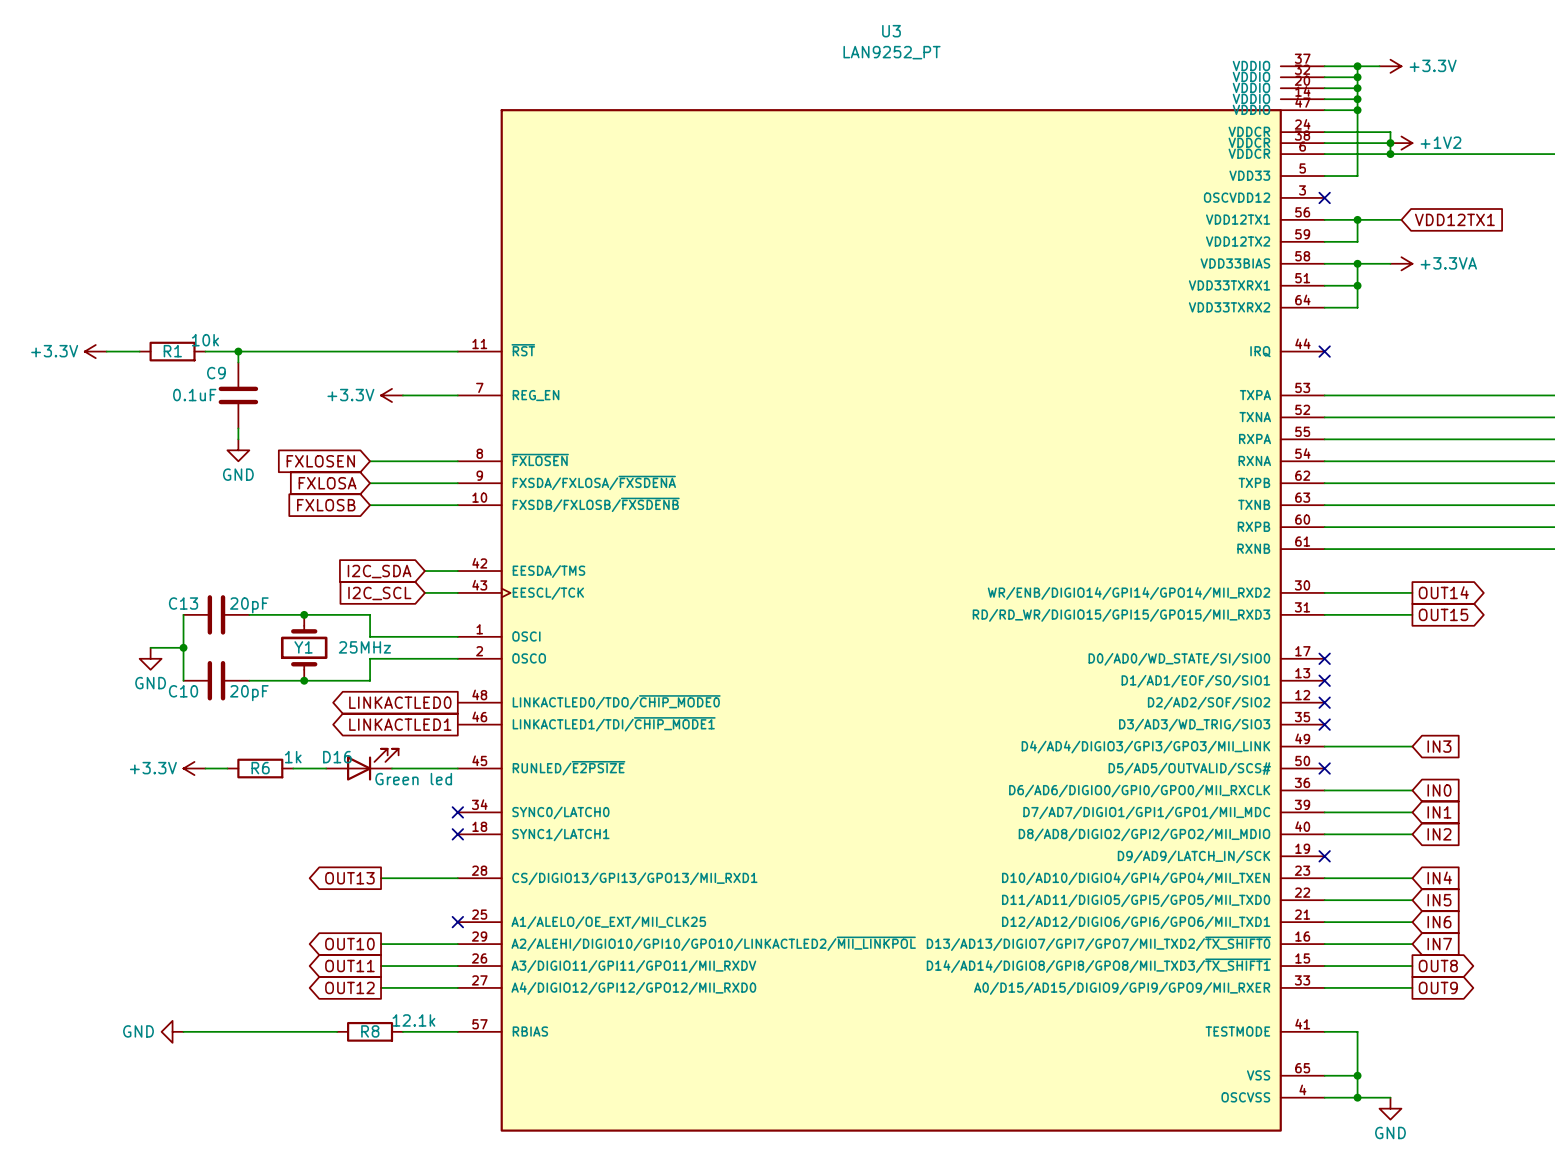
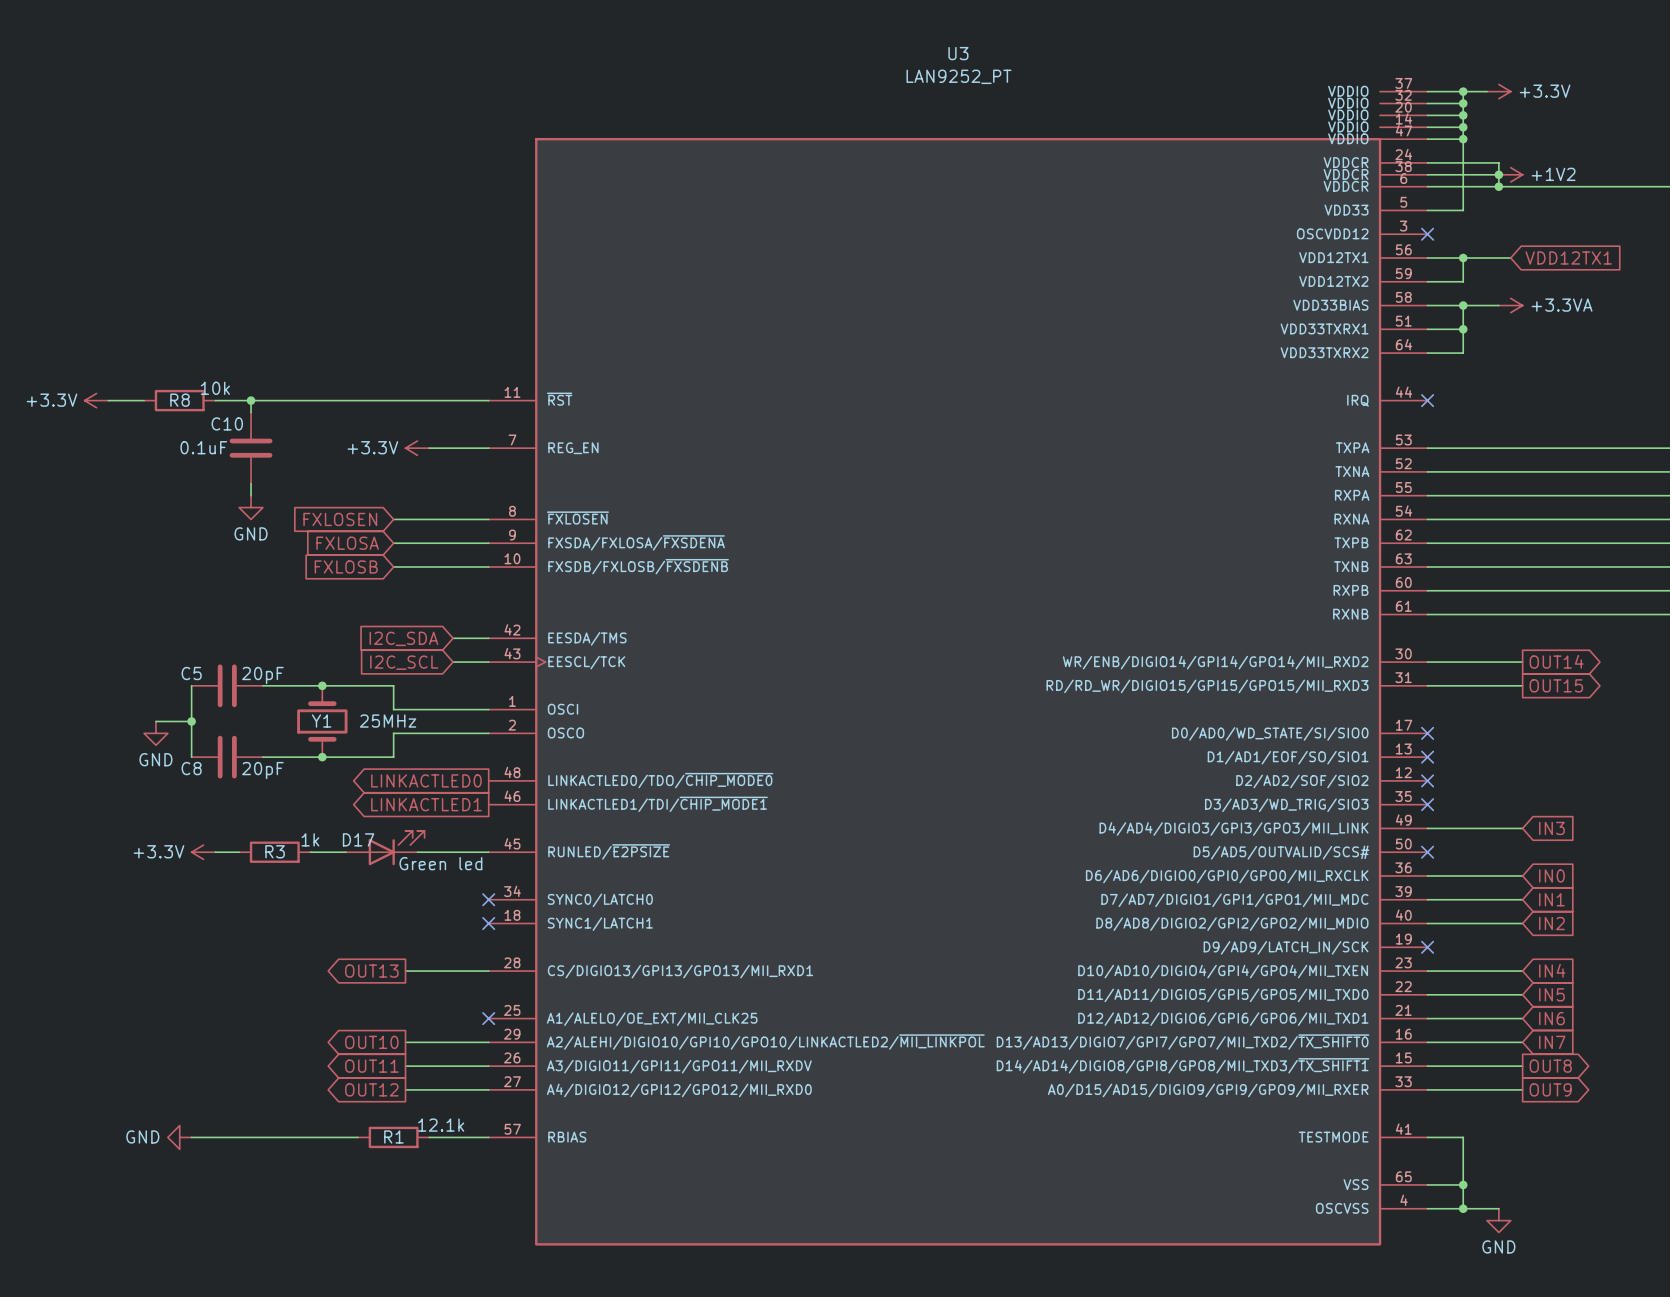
R1 name: R1 (172, 351) -> R8 (180, 400)
C9 name: C9 (216, 373) -> C10 (227, 423)
C13 name: C13 (183, 603) -> C5 (191, 673)
C10 name: C10 (183, 691) -> C8 (191, 768)
D16 name: D16 (337, 757) -> D17 (358, 839)
R6 name: R6 (260, 768) -> R3 (275, 851)
R8 name: R8 (370, 1031) -> R1 (393, 1136)

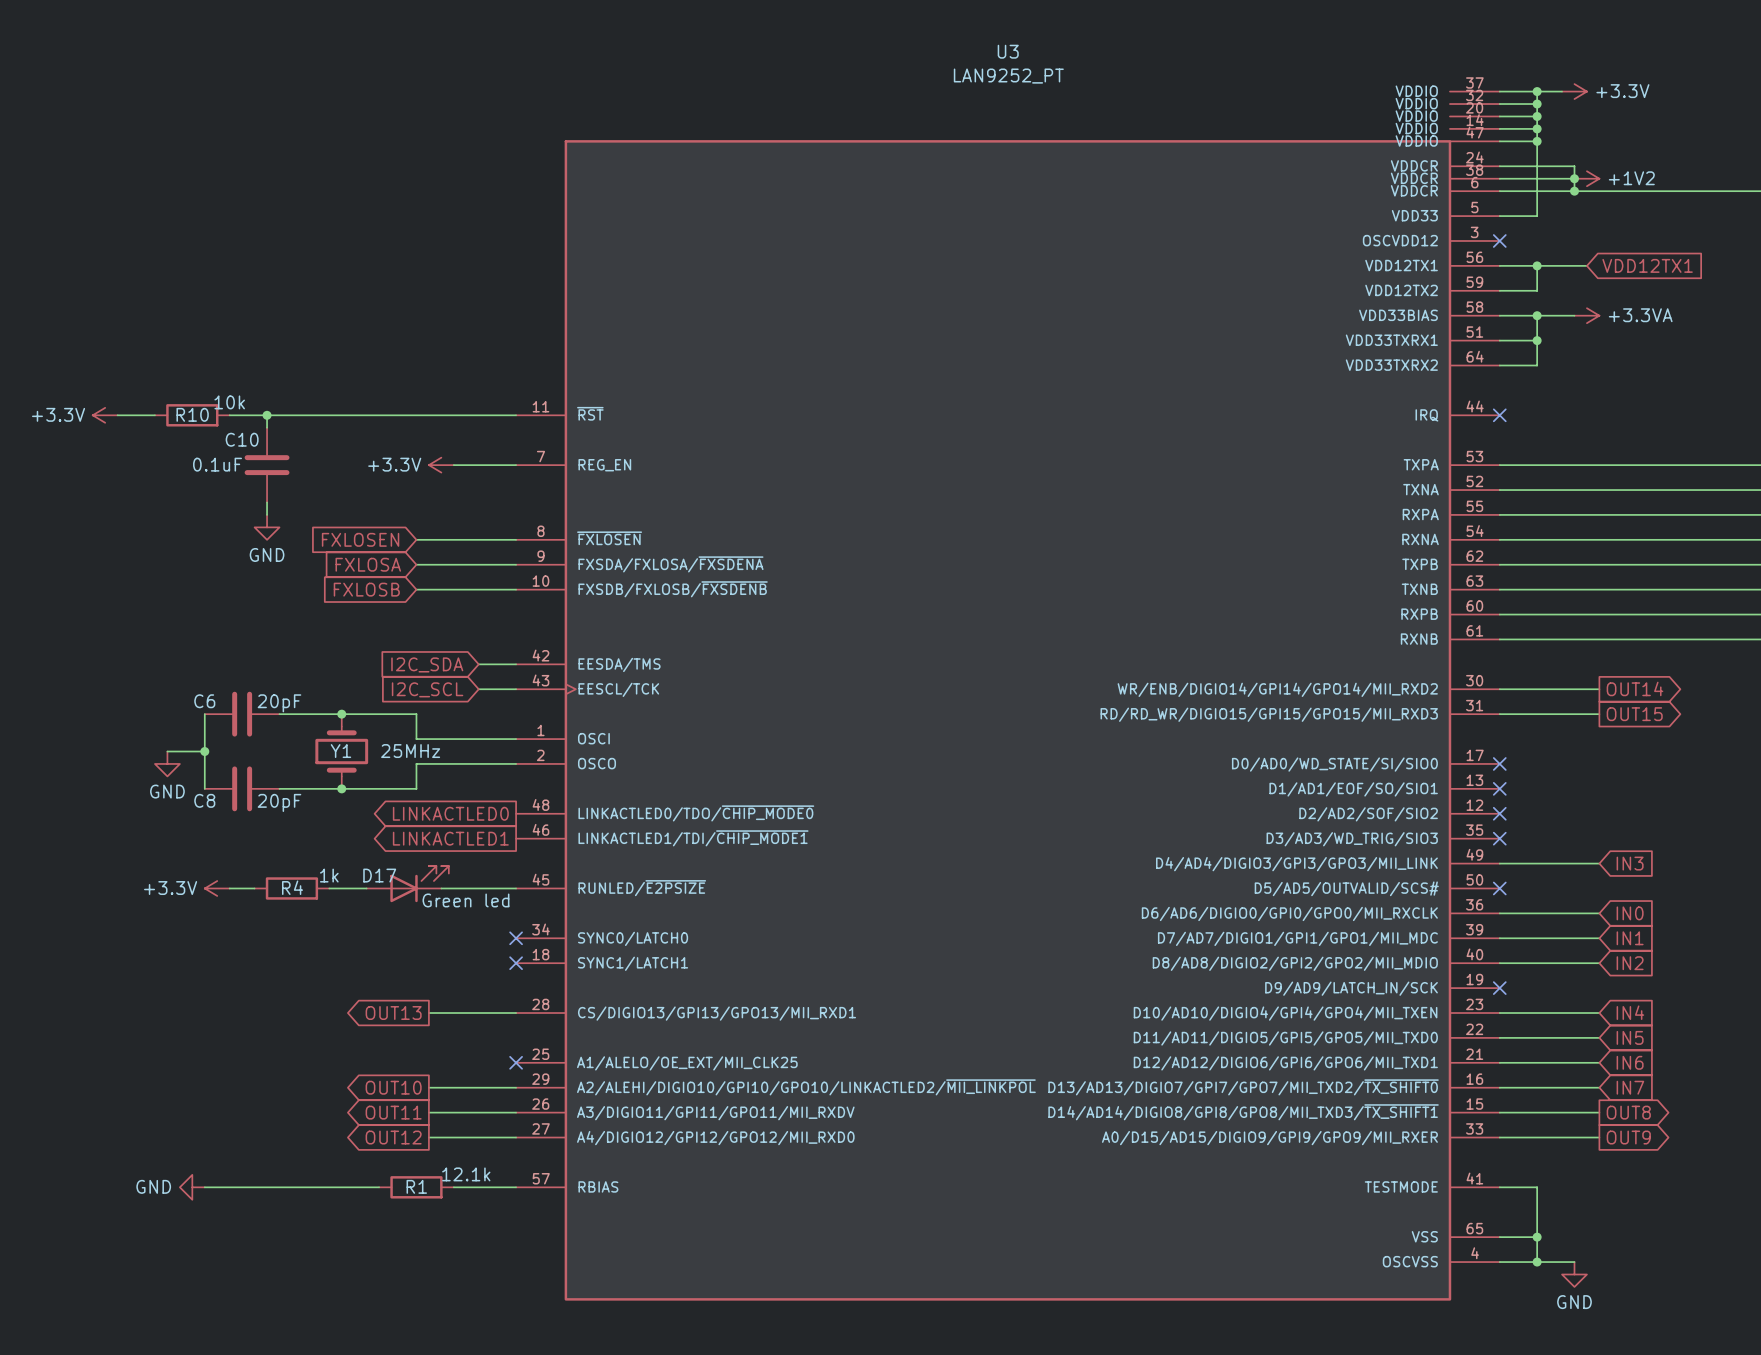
R8 name: R8 (180, 400) -> R10 (192, 414)
C5 name: C5 (191, 673) -> C6 (204, 701)
R3 name: R3 (275, 851) -> R4 (292, 887)

